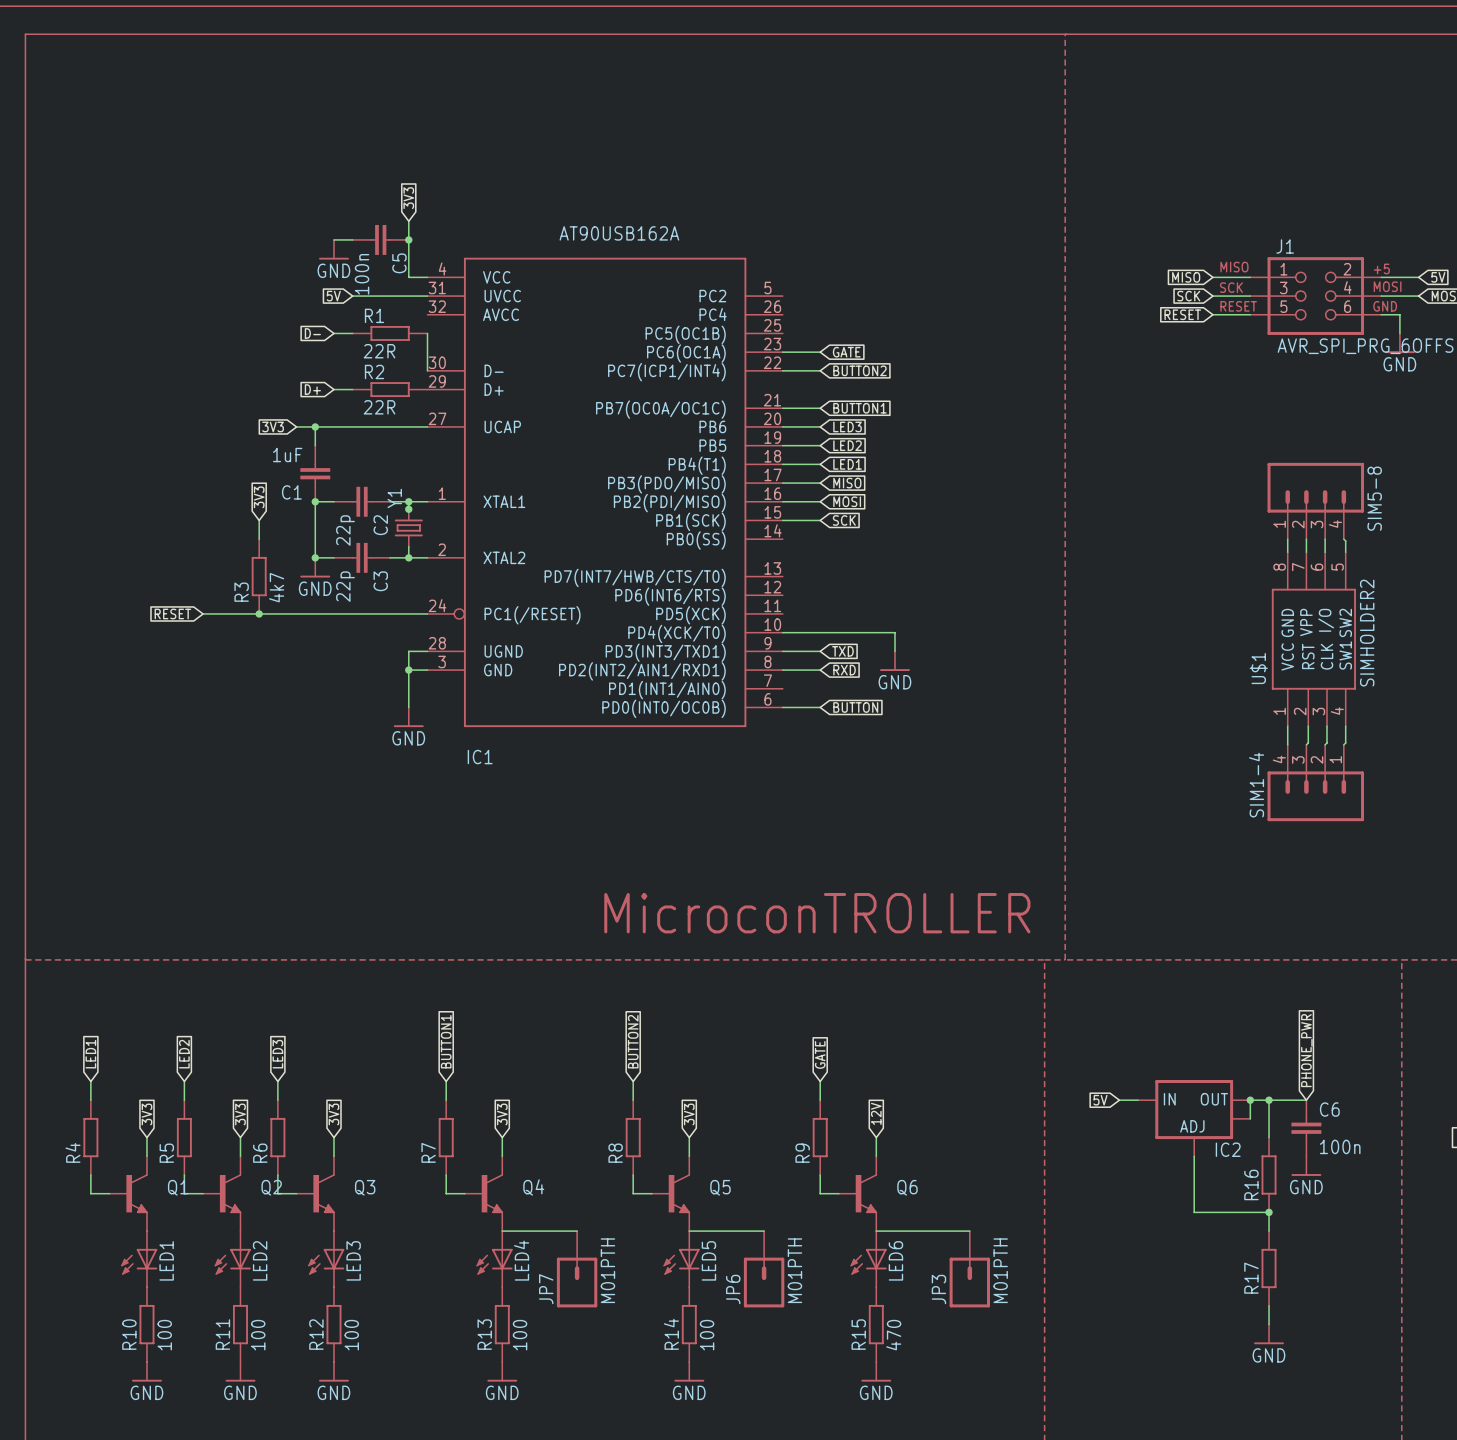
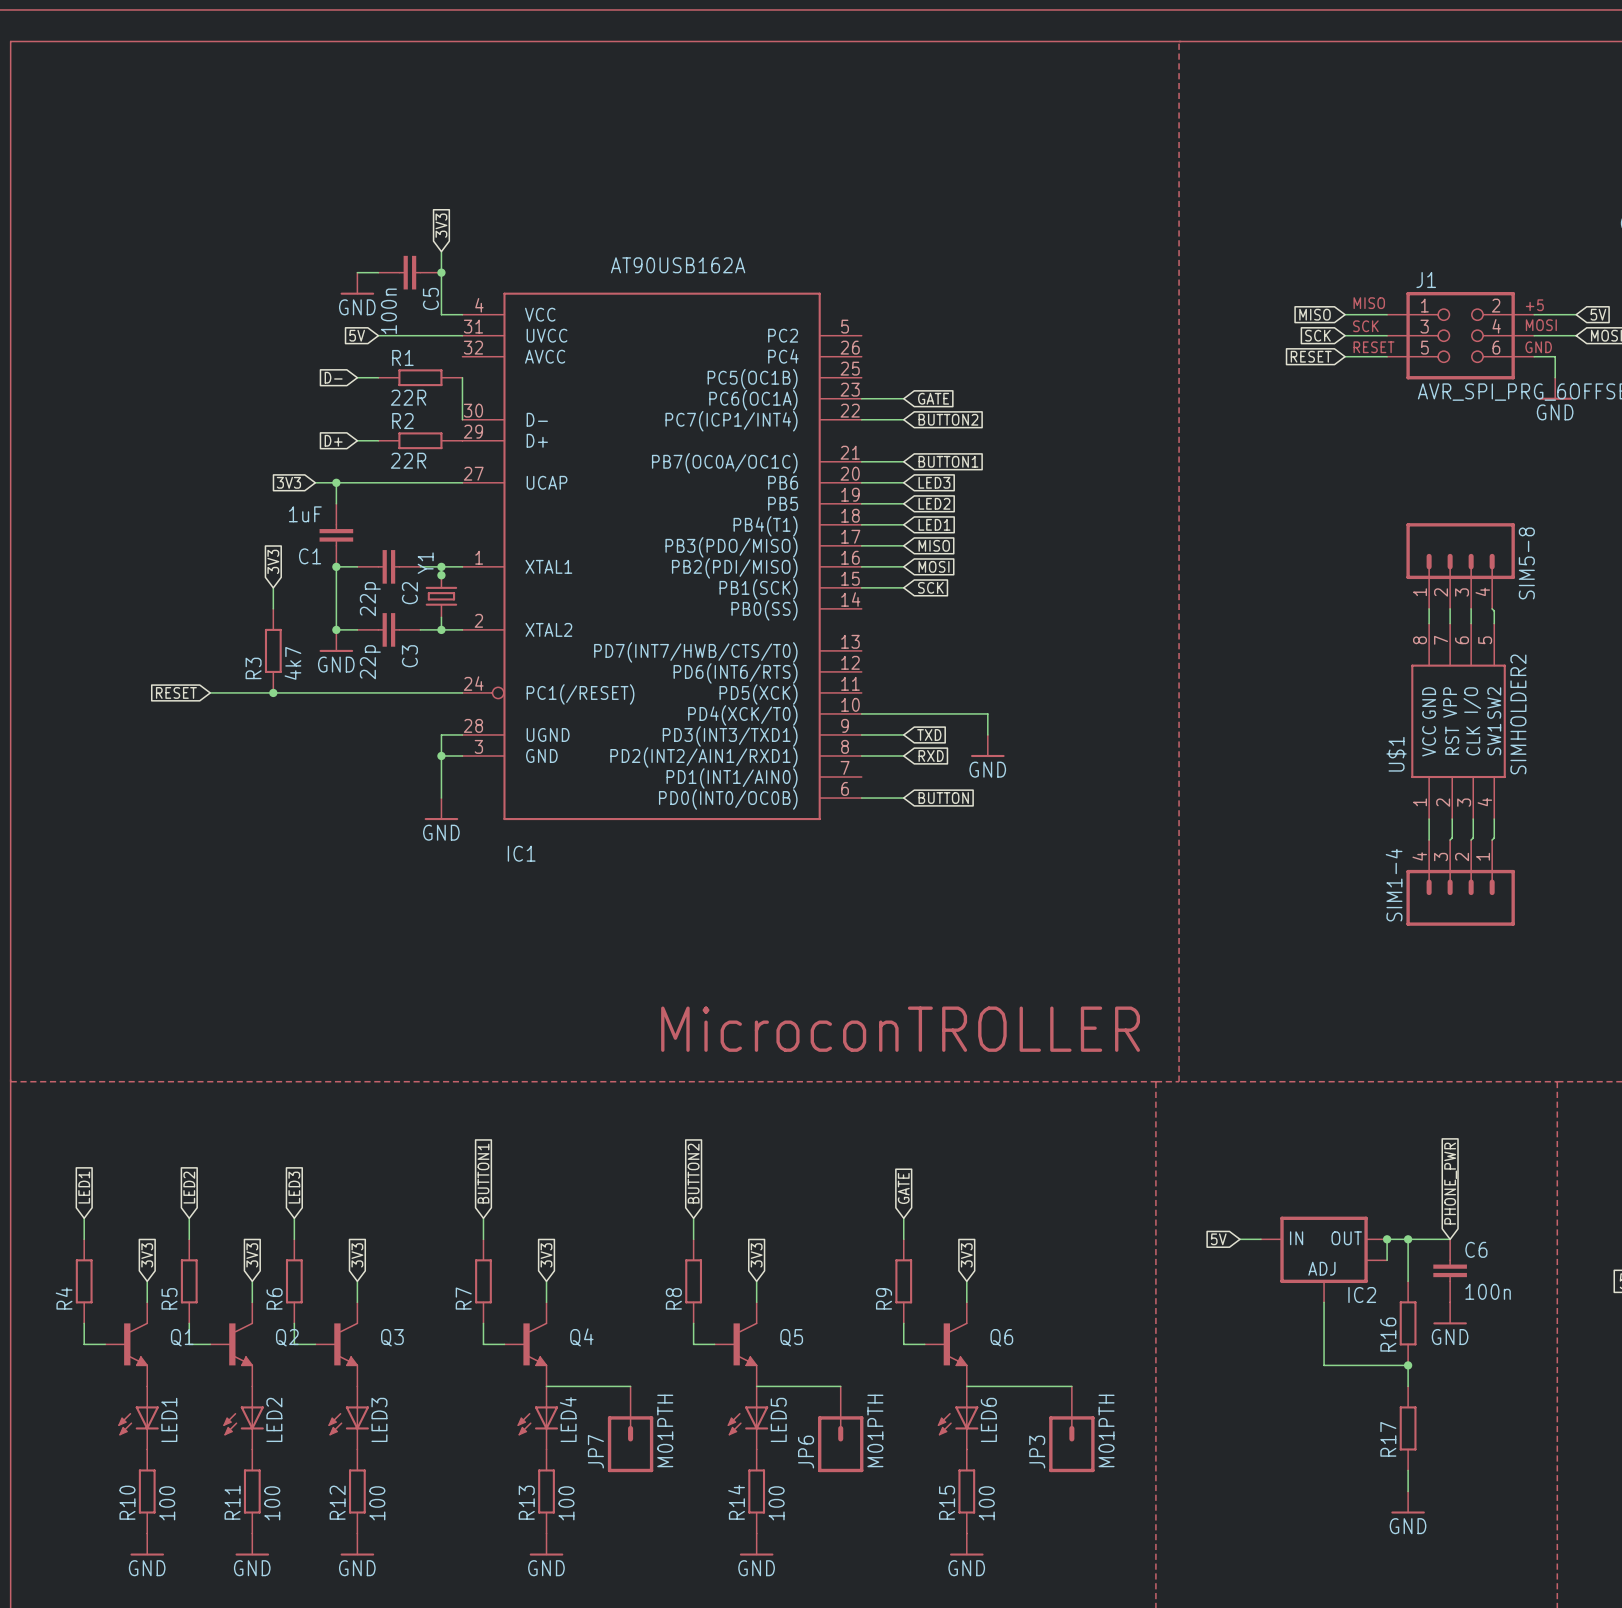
global label: 12V (876, 1113) -> 3V3 (966, 1255)
R15 value: 470 (893, 1335) -> 100 (986, 1503)

